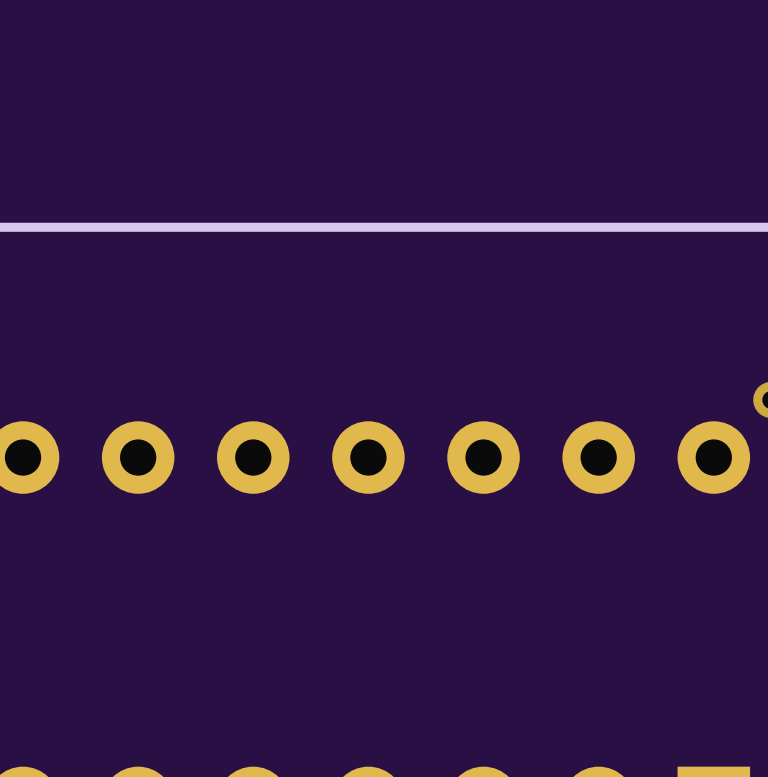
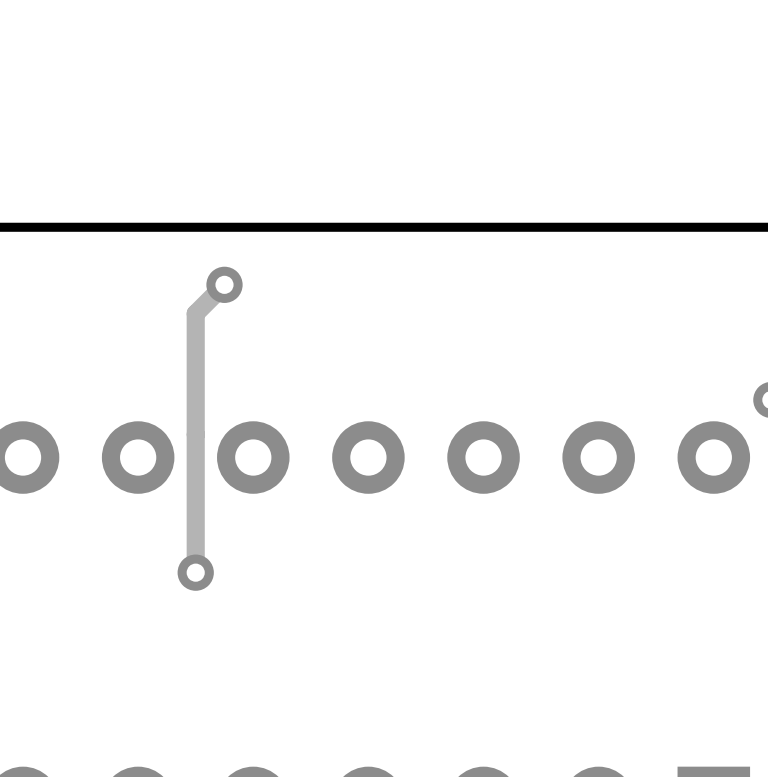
track: none -> (224, 284) (195, 313) (195, 572)
via: none -> (224, 284)
via: none -> (195, 572)

